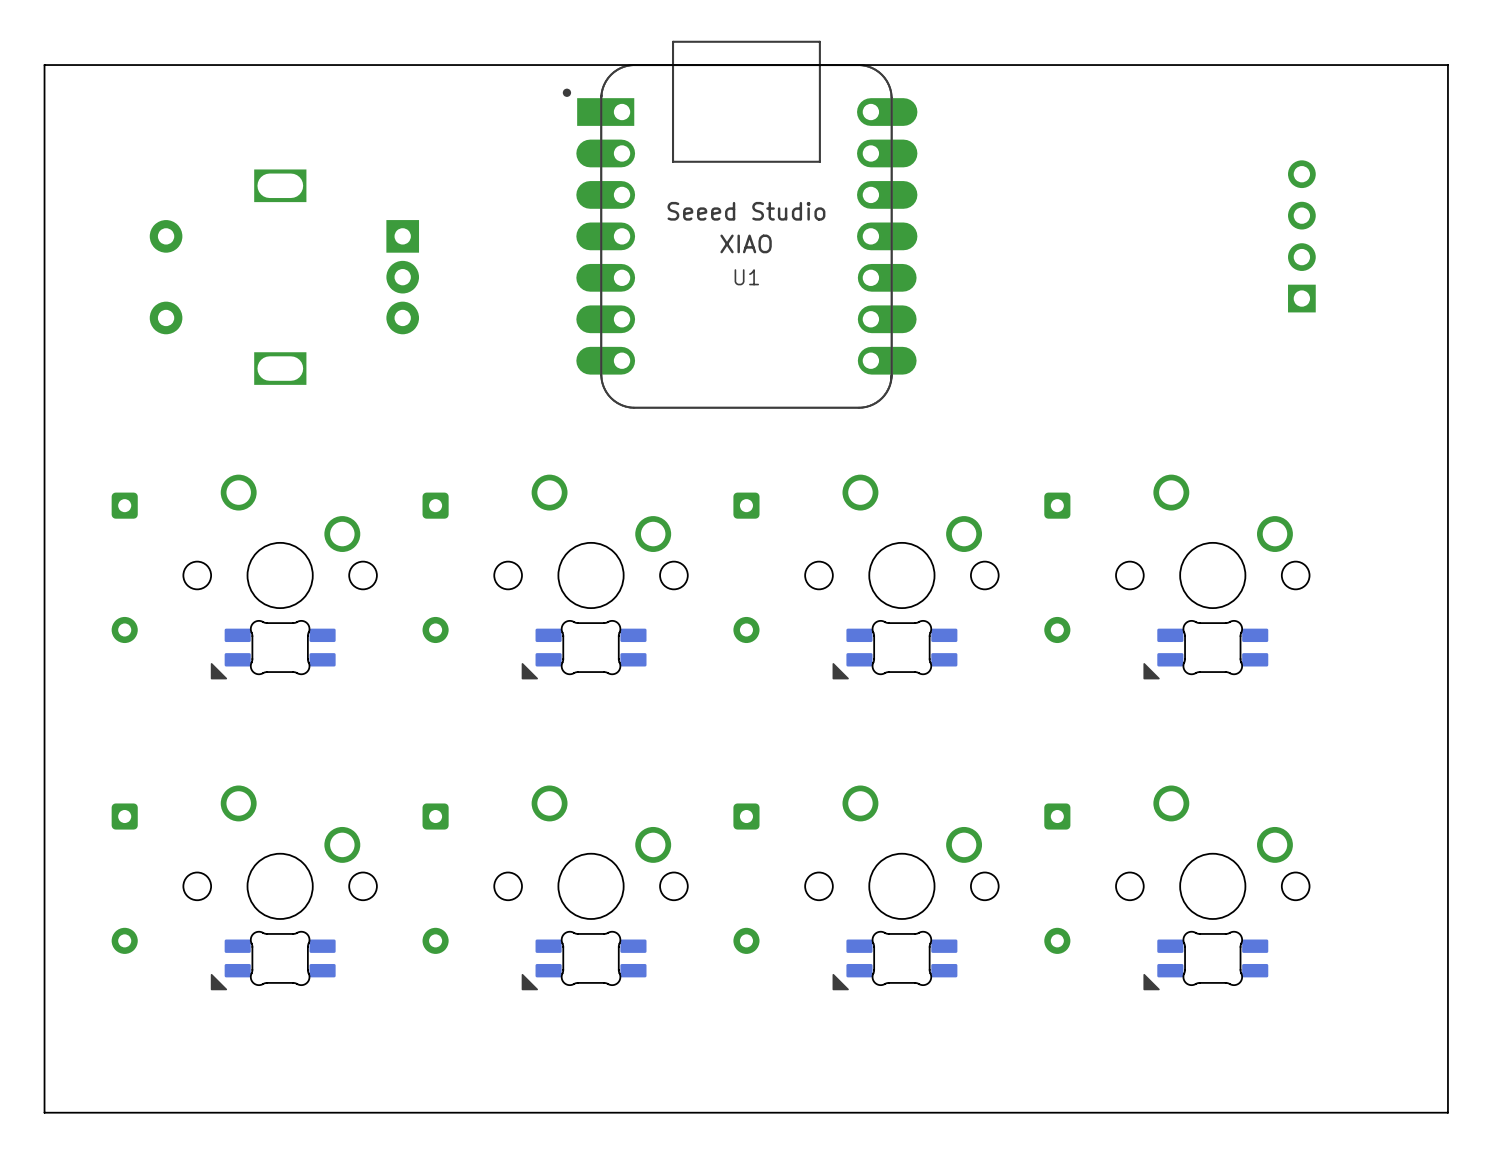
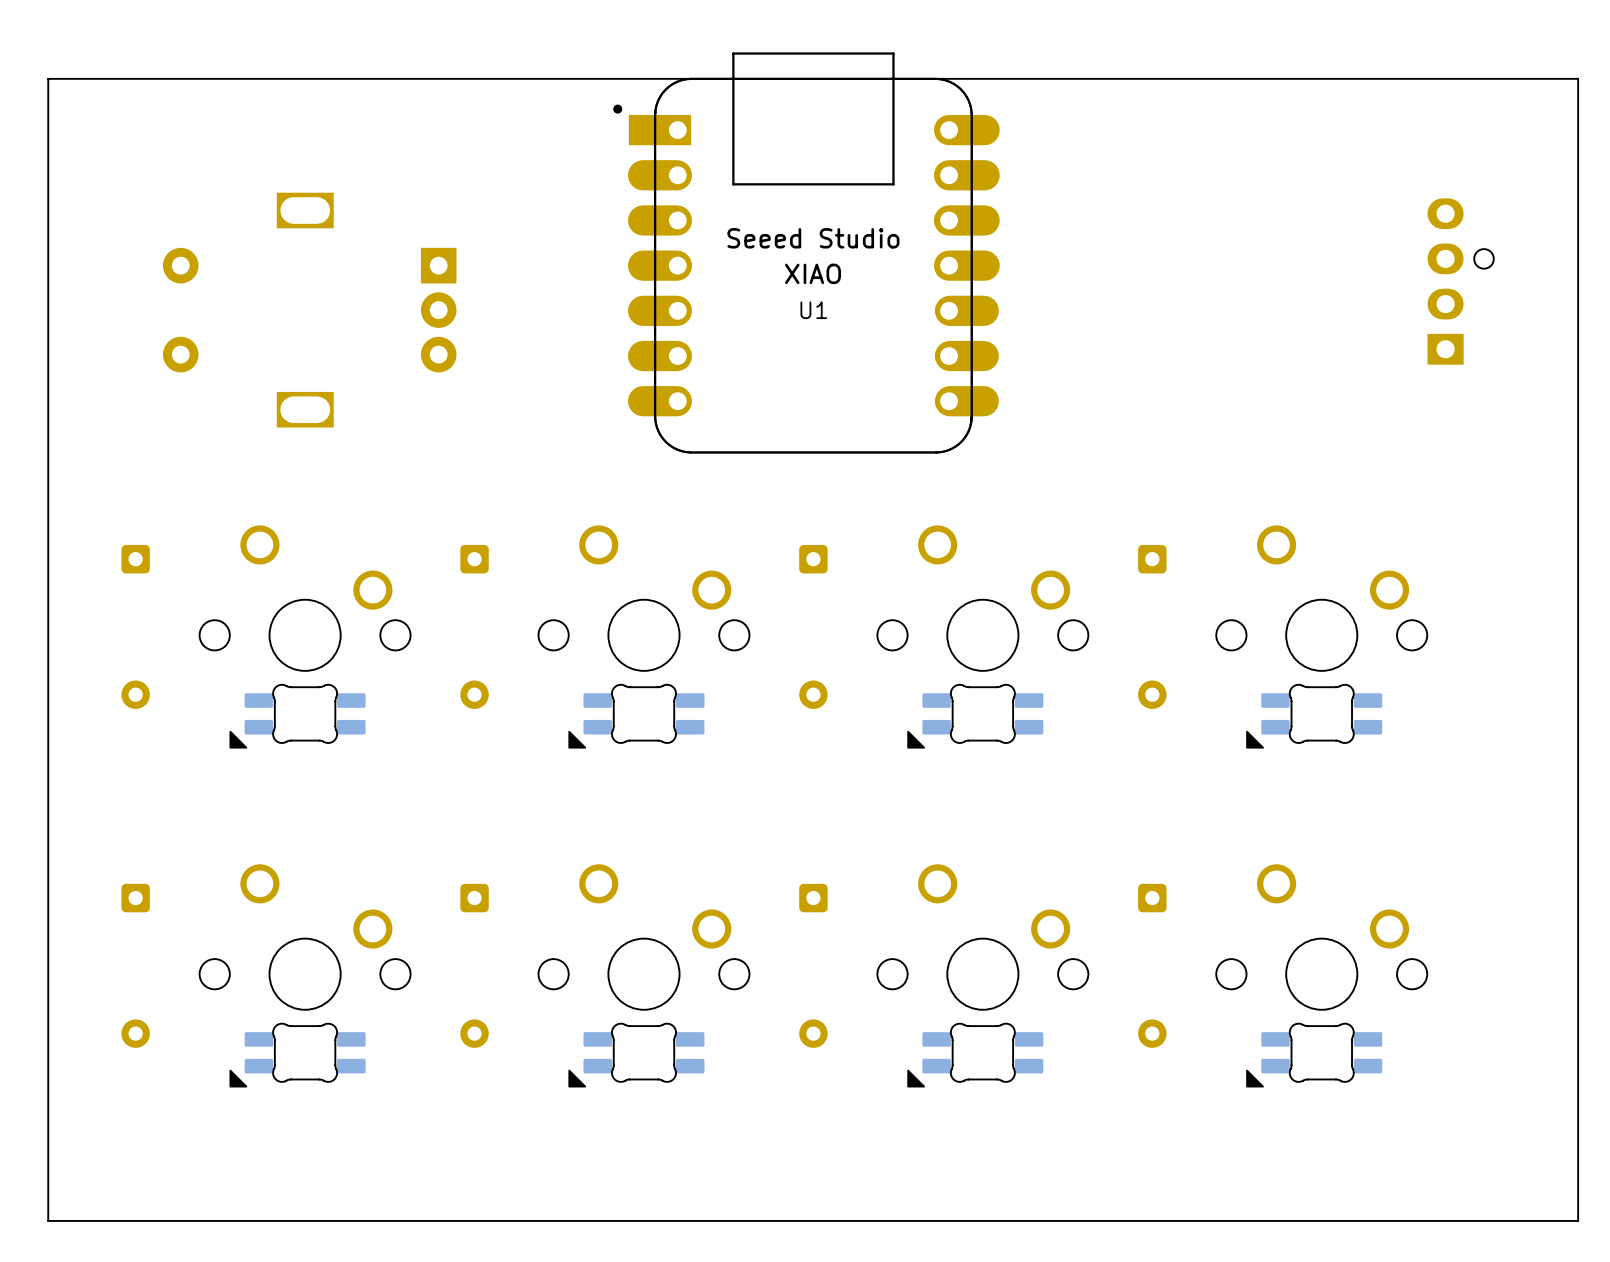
part: (1301, 236) -> none
part: none -> (1460, 281)

